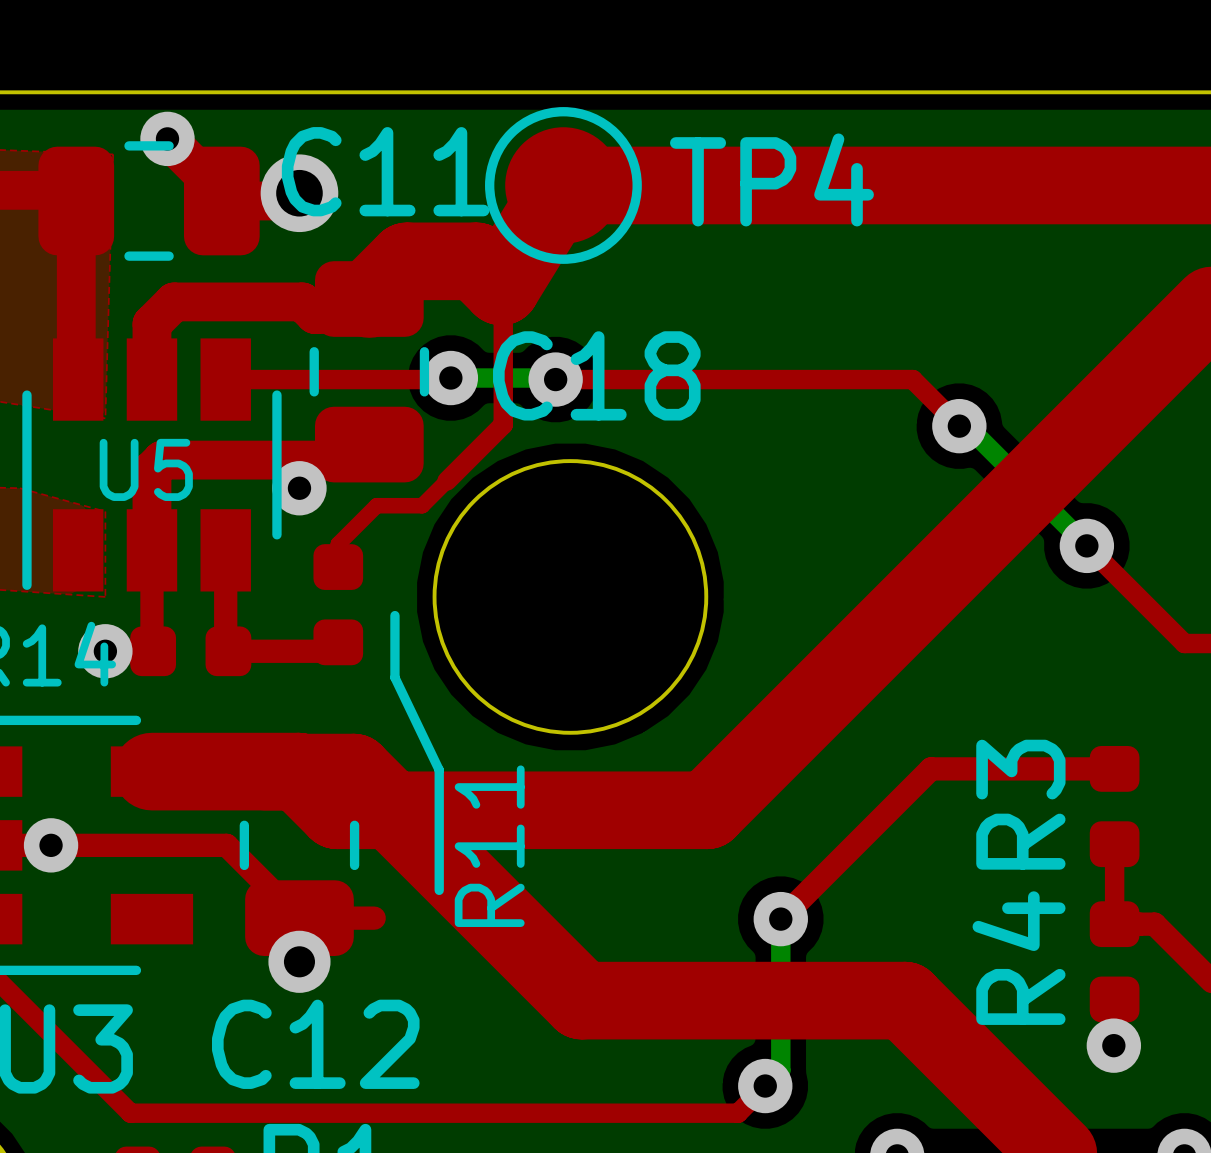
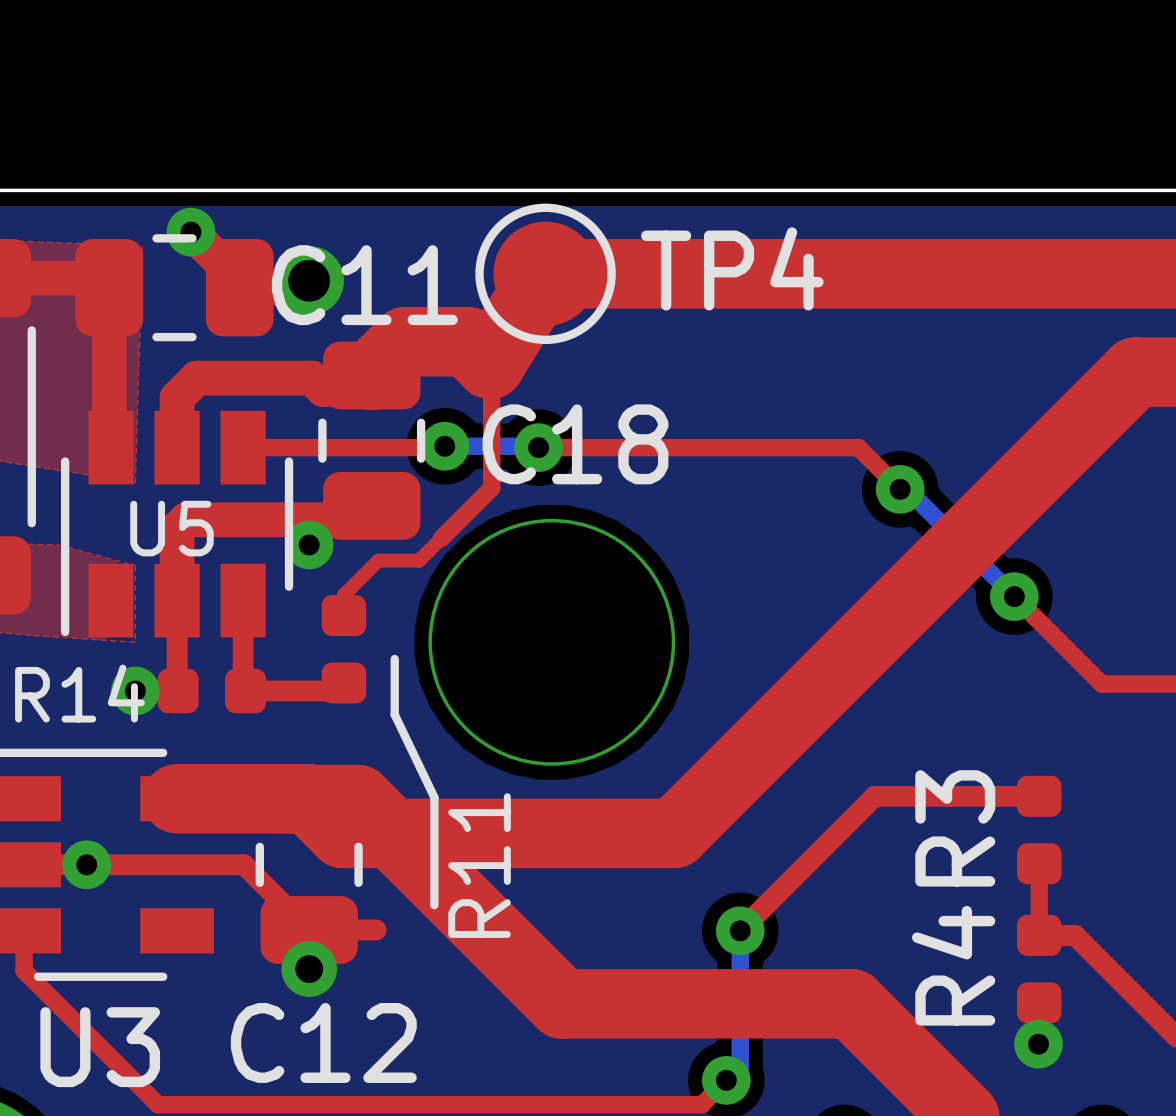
C11 name position: C11 (385, 171) -> C11 (364, 285)

